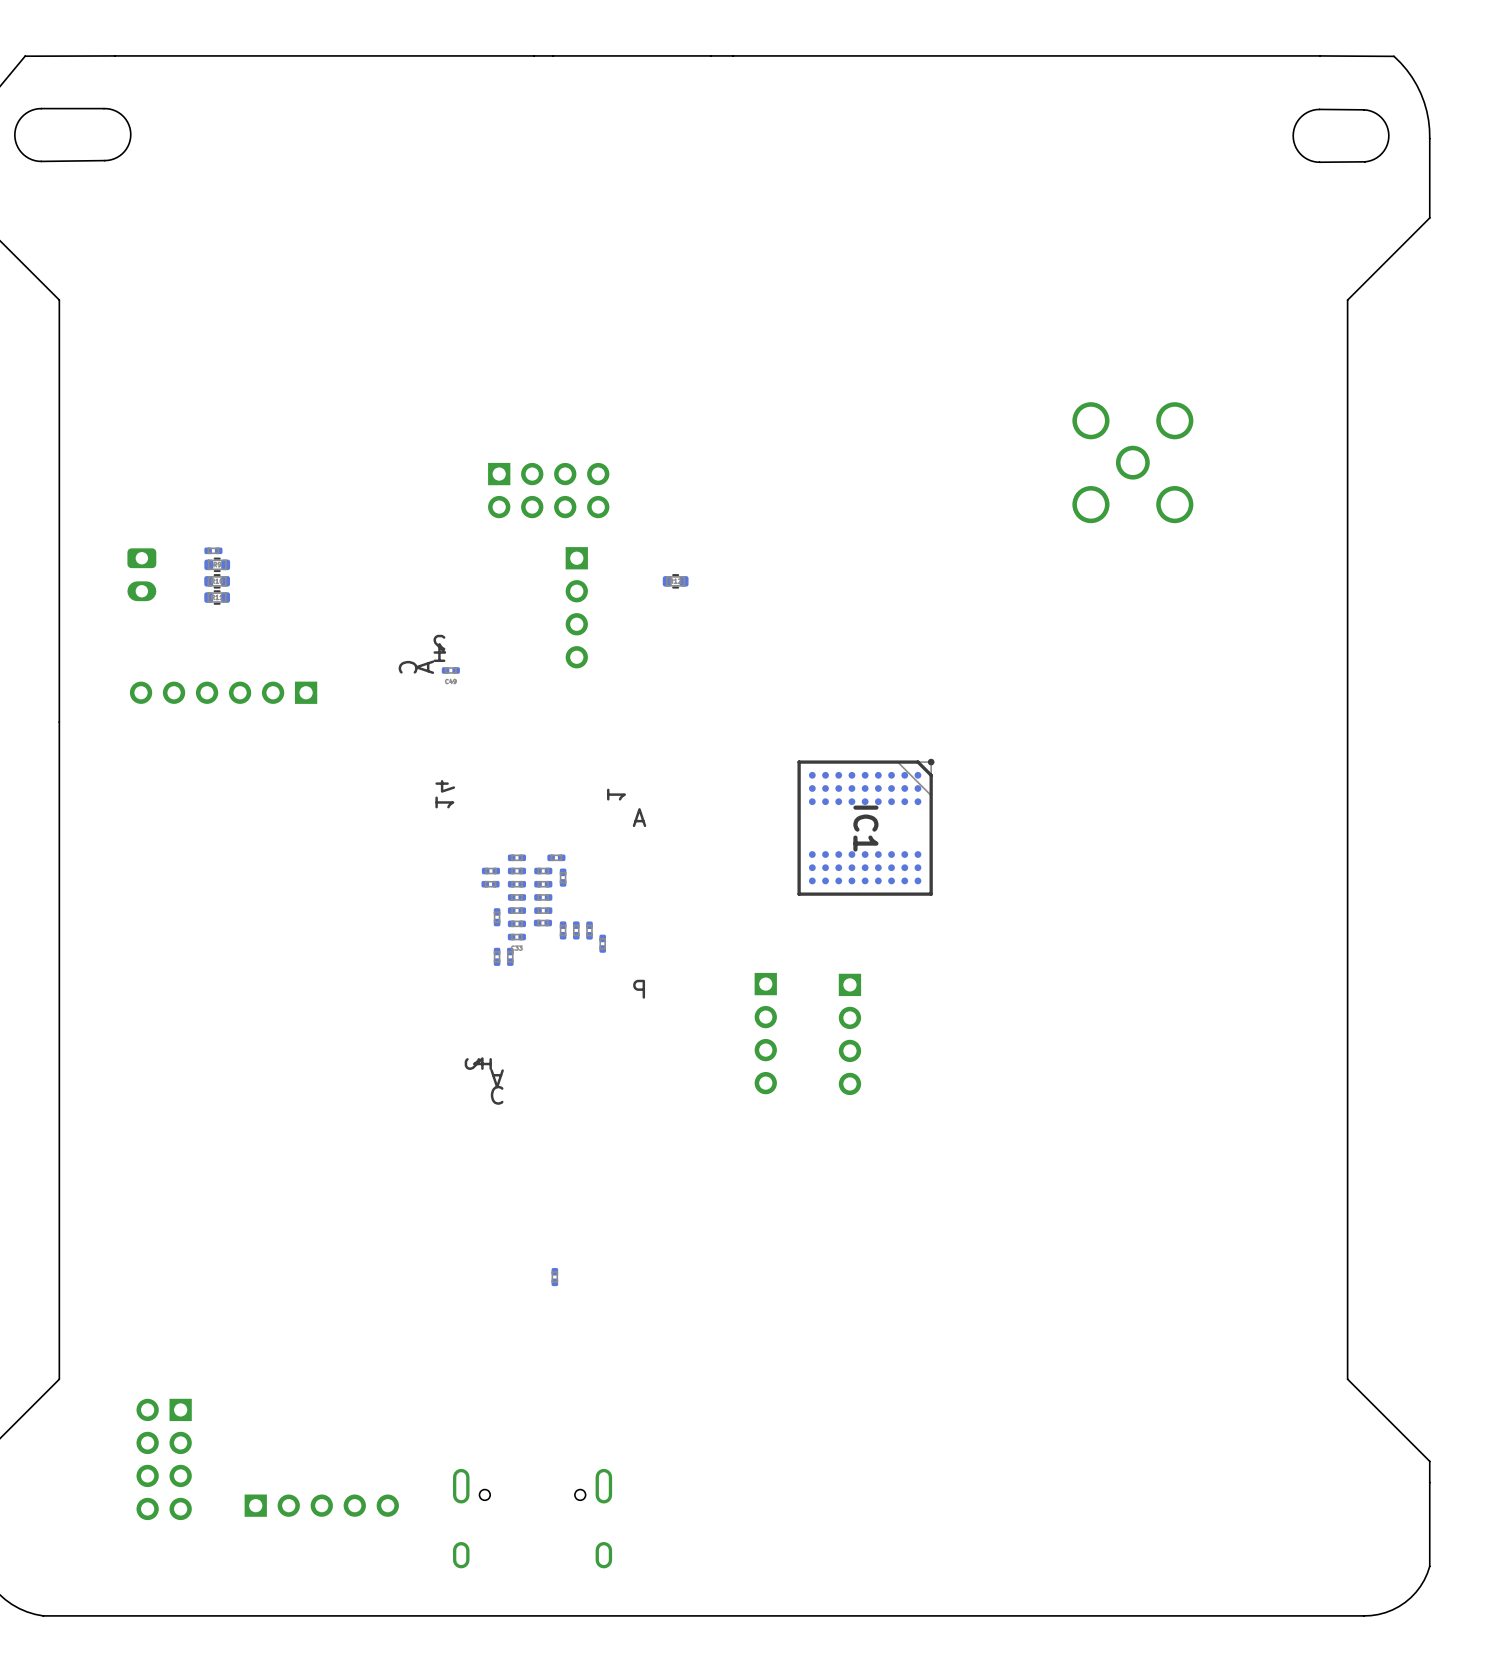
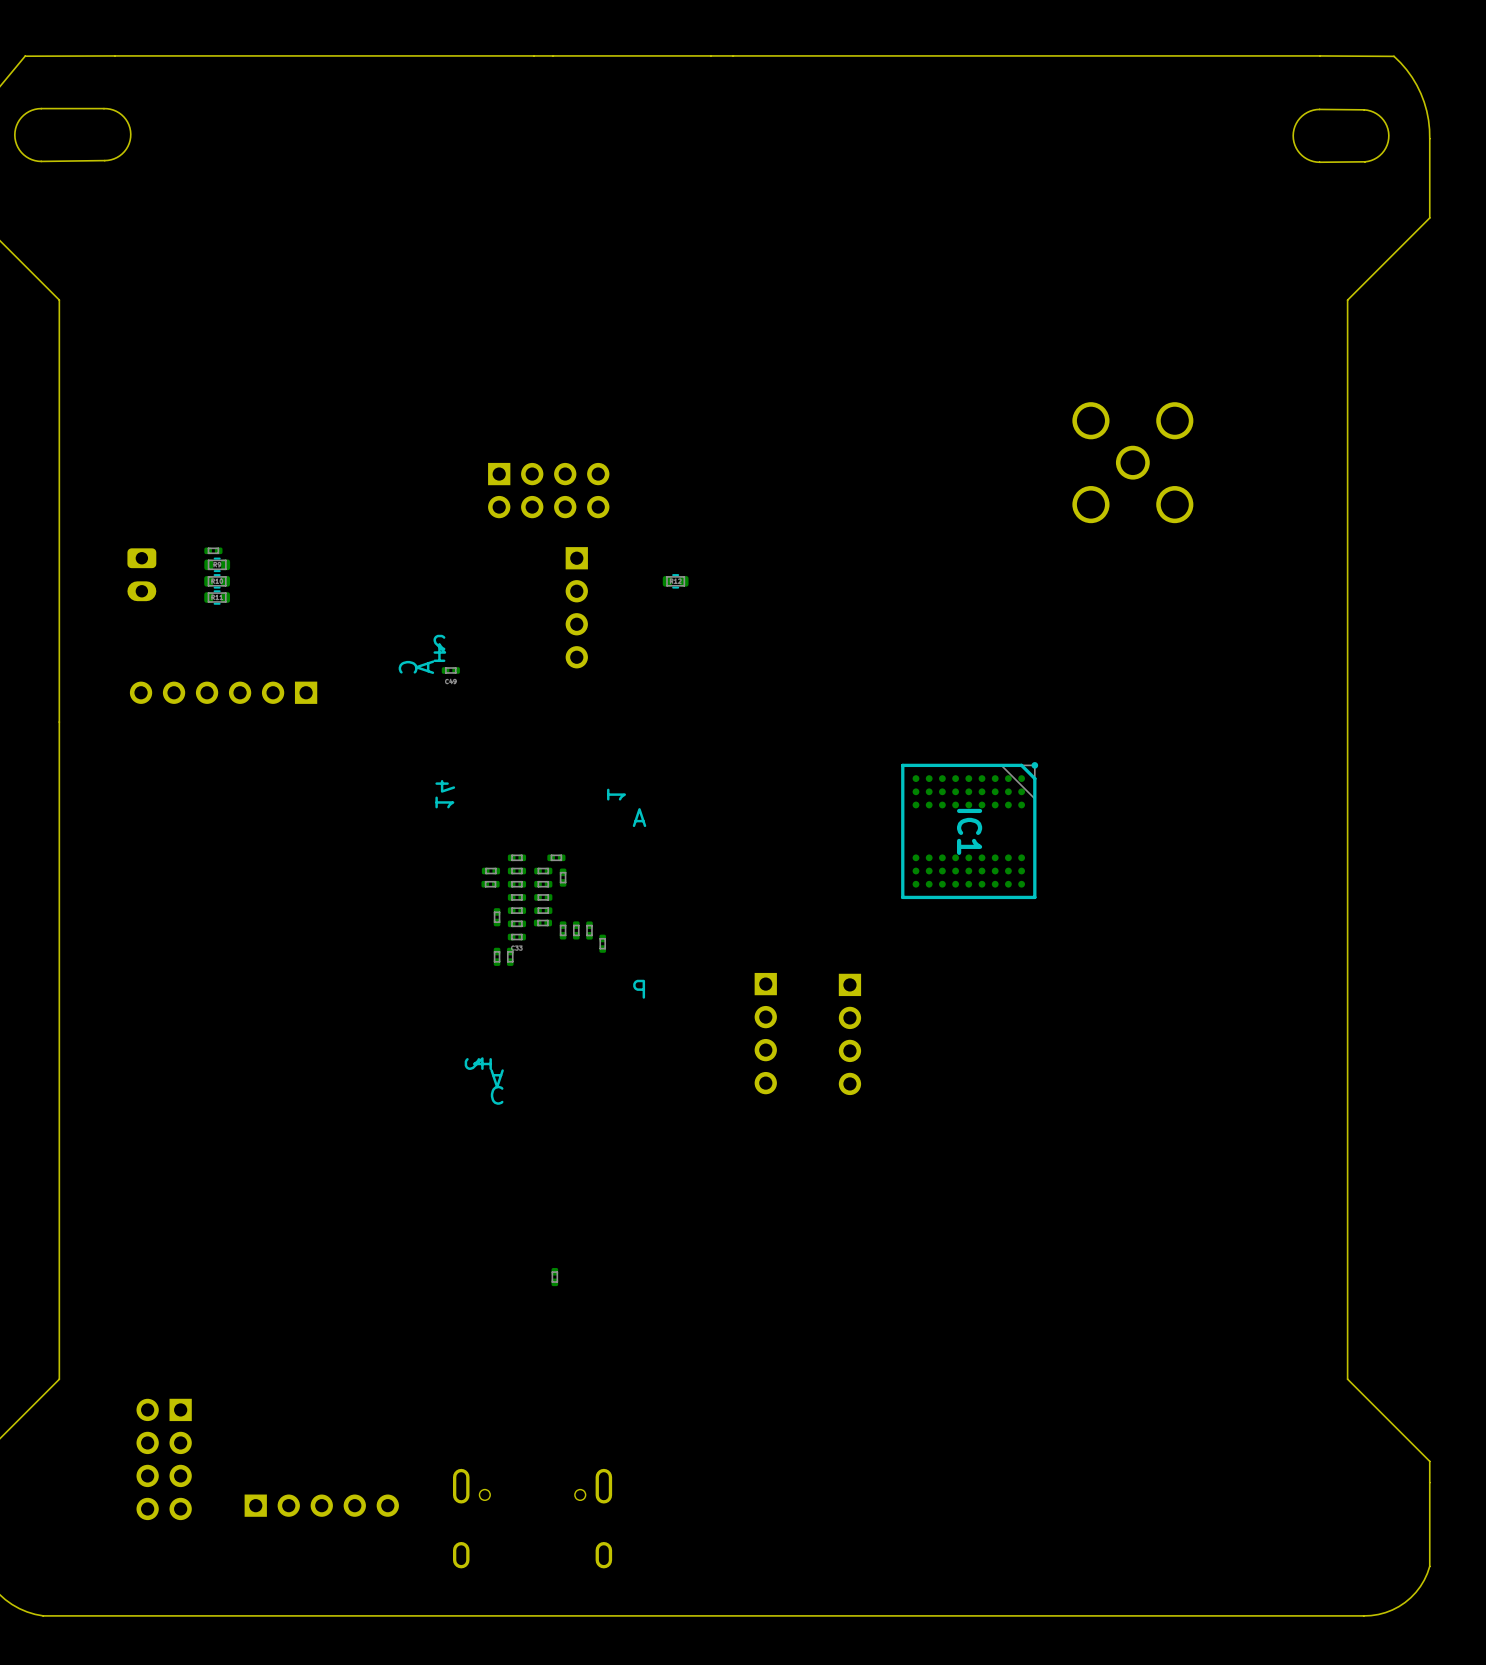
IC1 position: (865, 827) -> (969, 830)

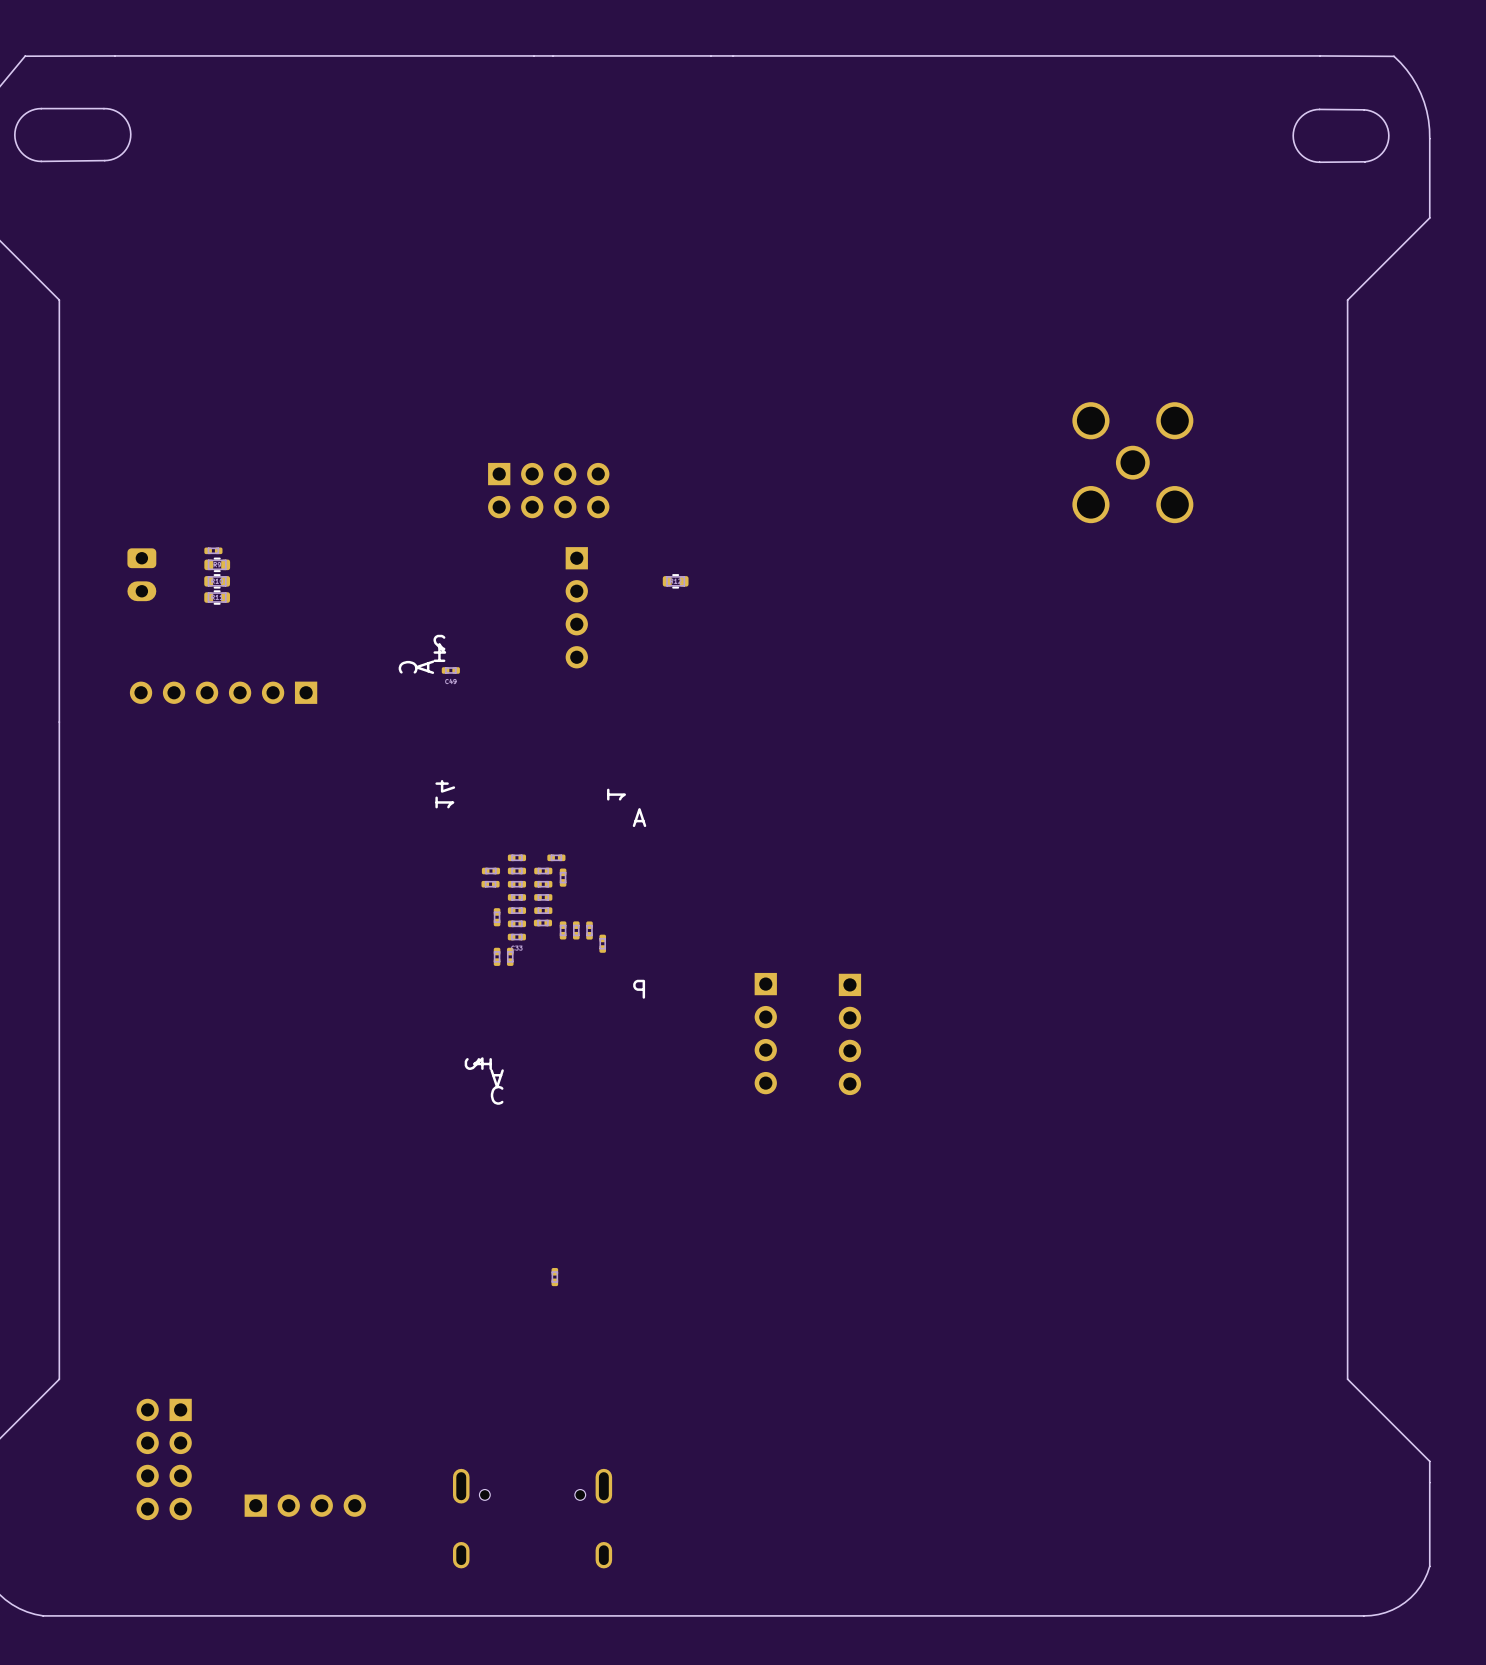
IC1: (969, 830) -> none
part footprint: [244, 1494, 399, 1517] -> [244, 1494, 366, 1517]

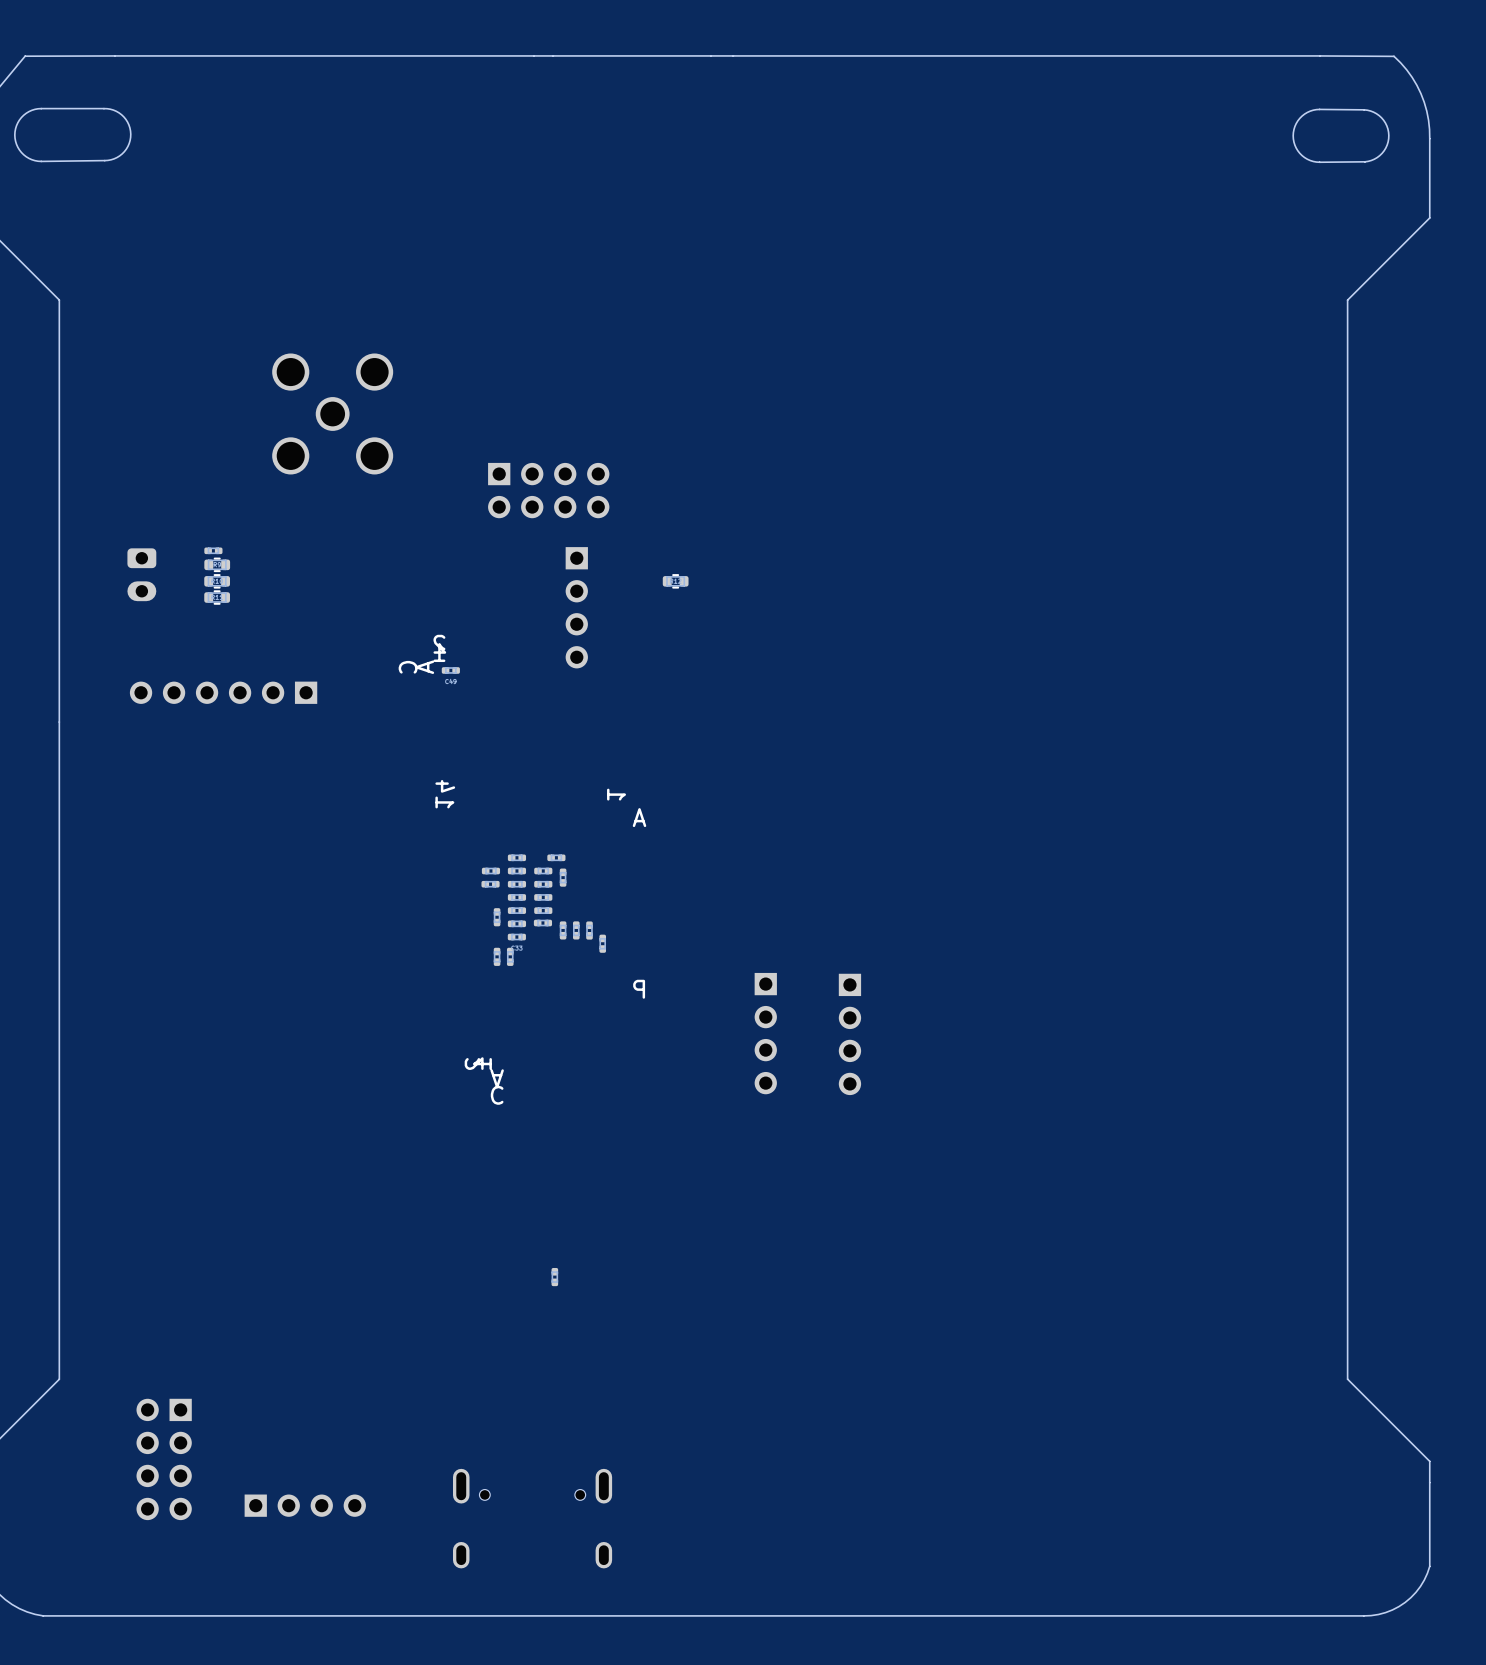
part: none -> (332, 413)
part: (1132, 462) -> none

